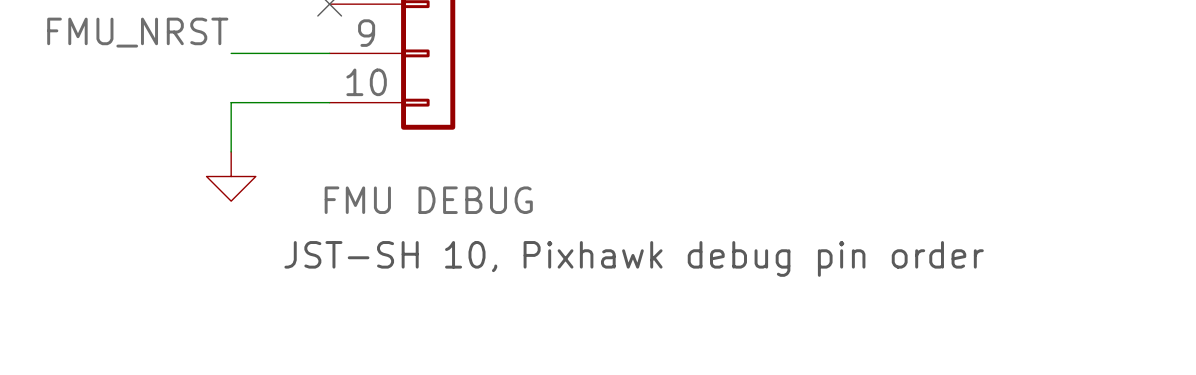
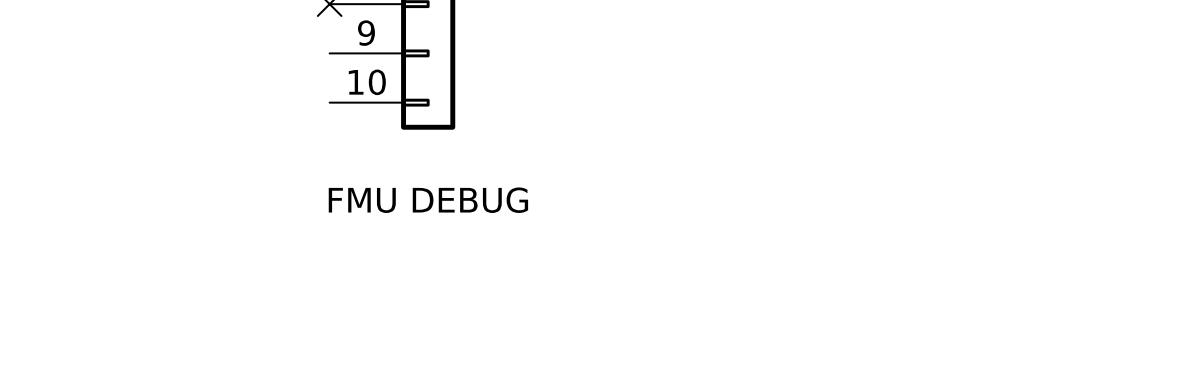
label: FMU_NRST (137, 32) -> none
wire: (231, 53) (329, 53) -> none
wire: (329, 102) (231, 102) (231, 151) -> none
power symbol: (231, 176) -> none
text: JST-SH 10, Pixhawk debug pin order (634, 258) -> none

